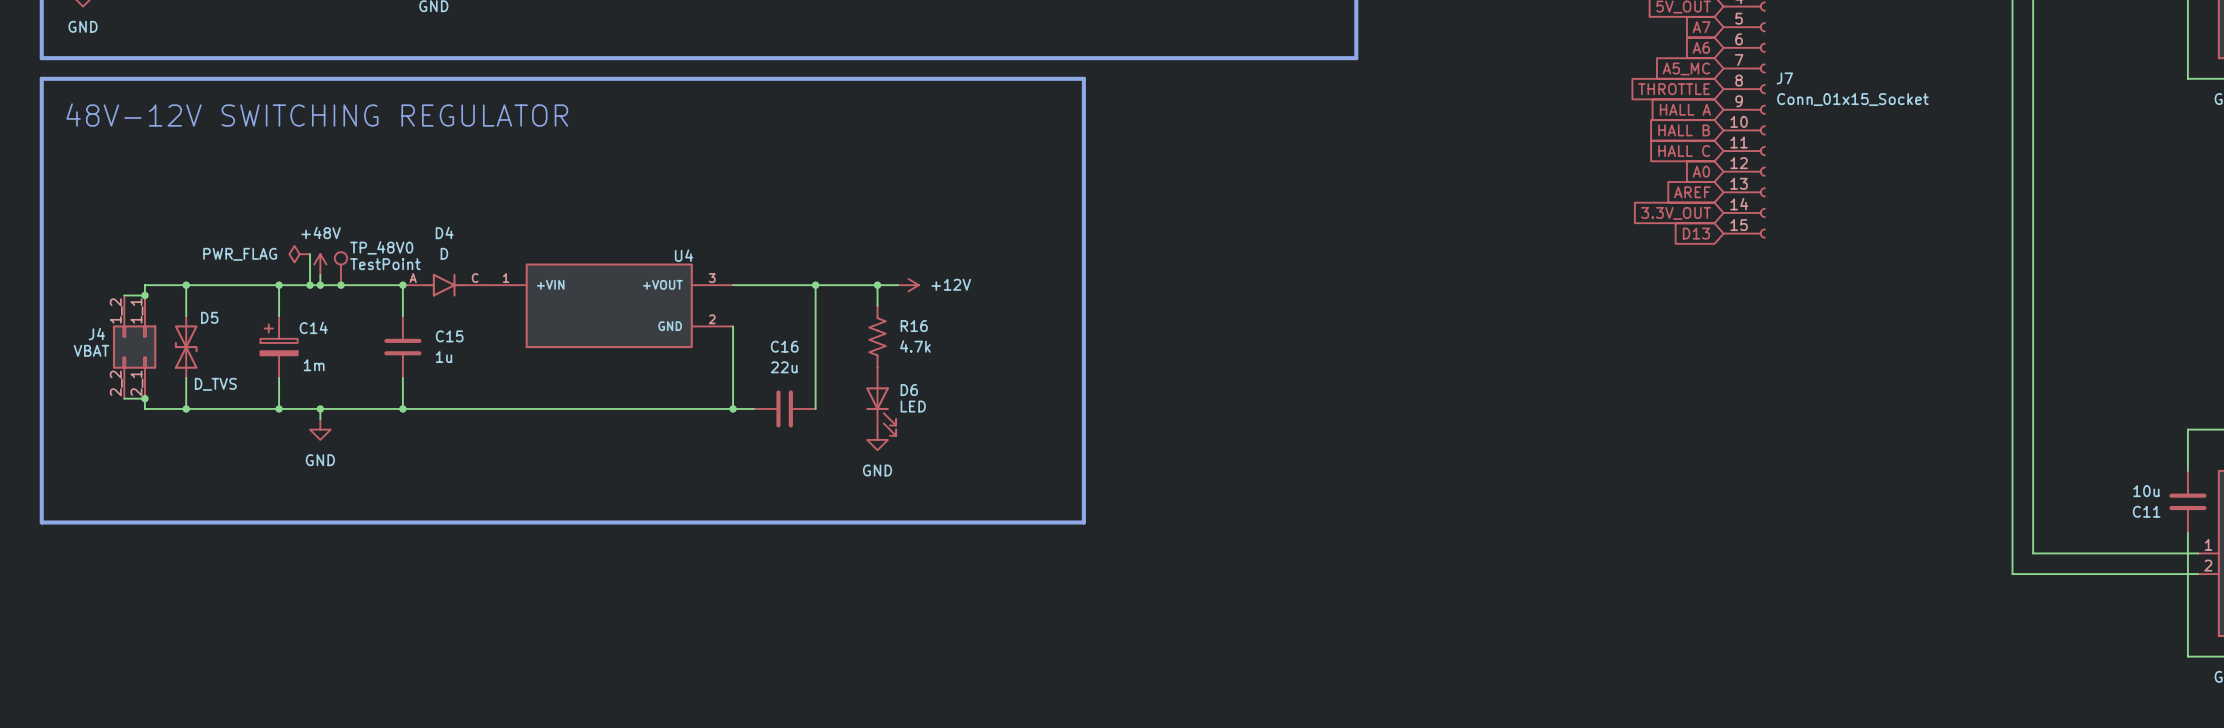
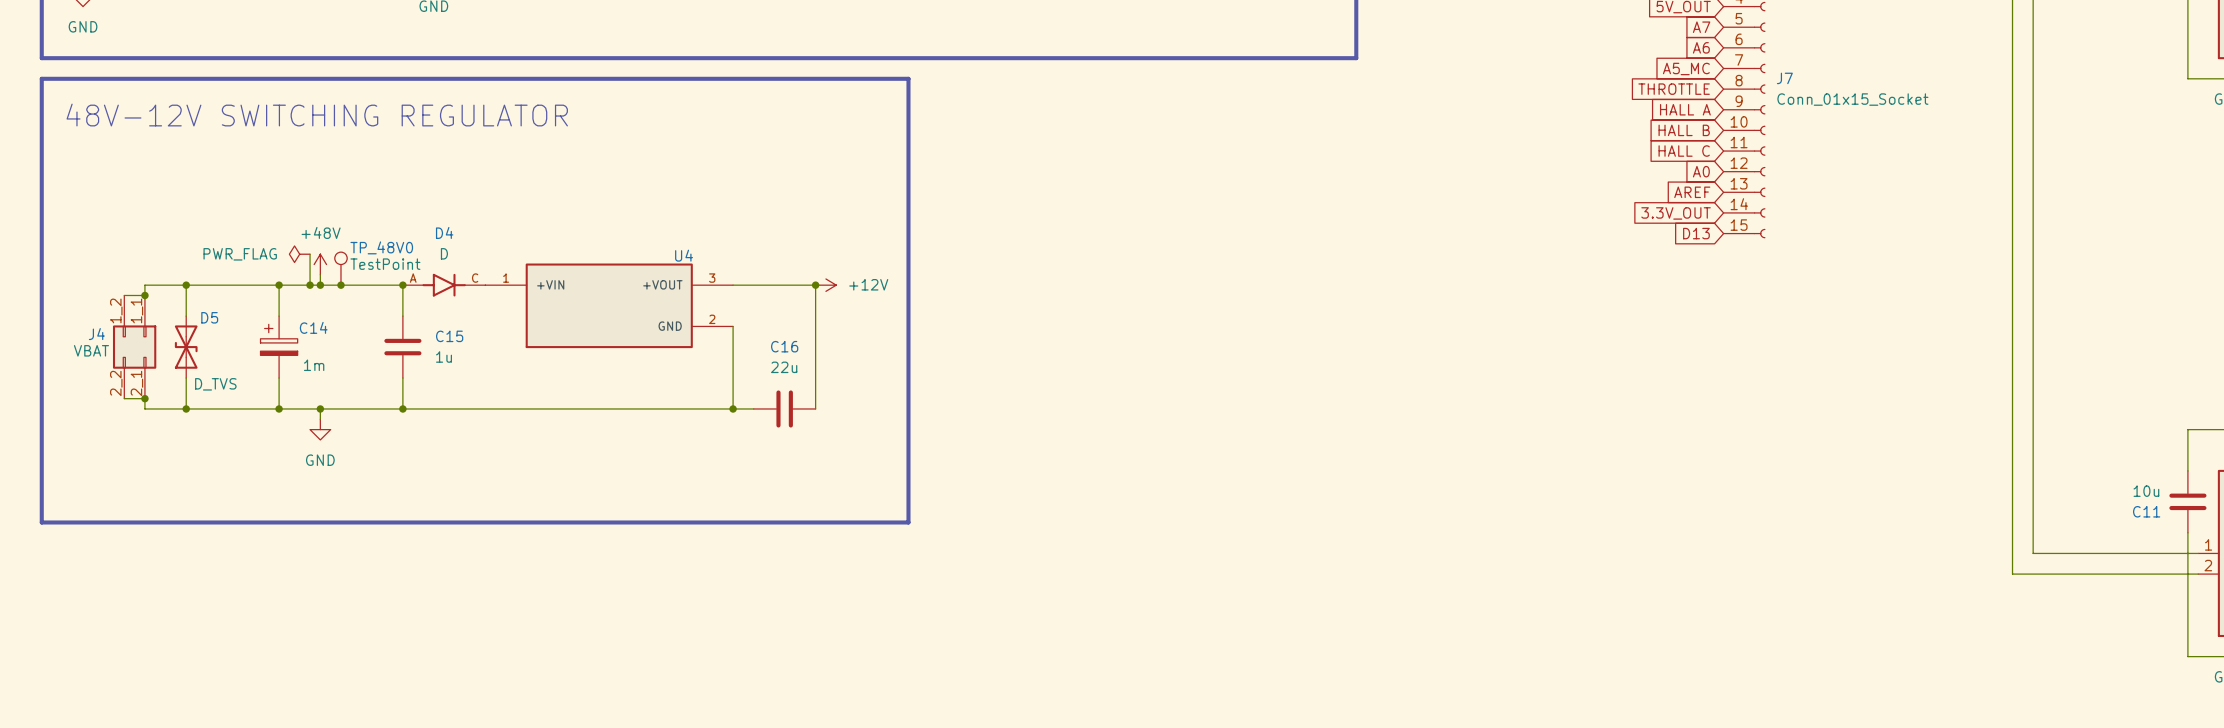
line: (908, 78) (1083, 78) (1083, 522) (908, 522) -> (908, 78) (908, 522)
wire: (815, 285) (898, 285) -> none
wire: (877, 285) (877, 305) -> none
junction: (877, 285) -> none
power symbol position: +12V (908, 285) -> +12V (825, 285)
R16: 4.7k (877, 336) -> none
D6: LED (881, 401) -> none
power symbol: GND (877, 439) -> none

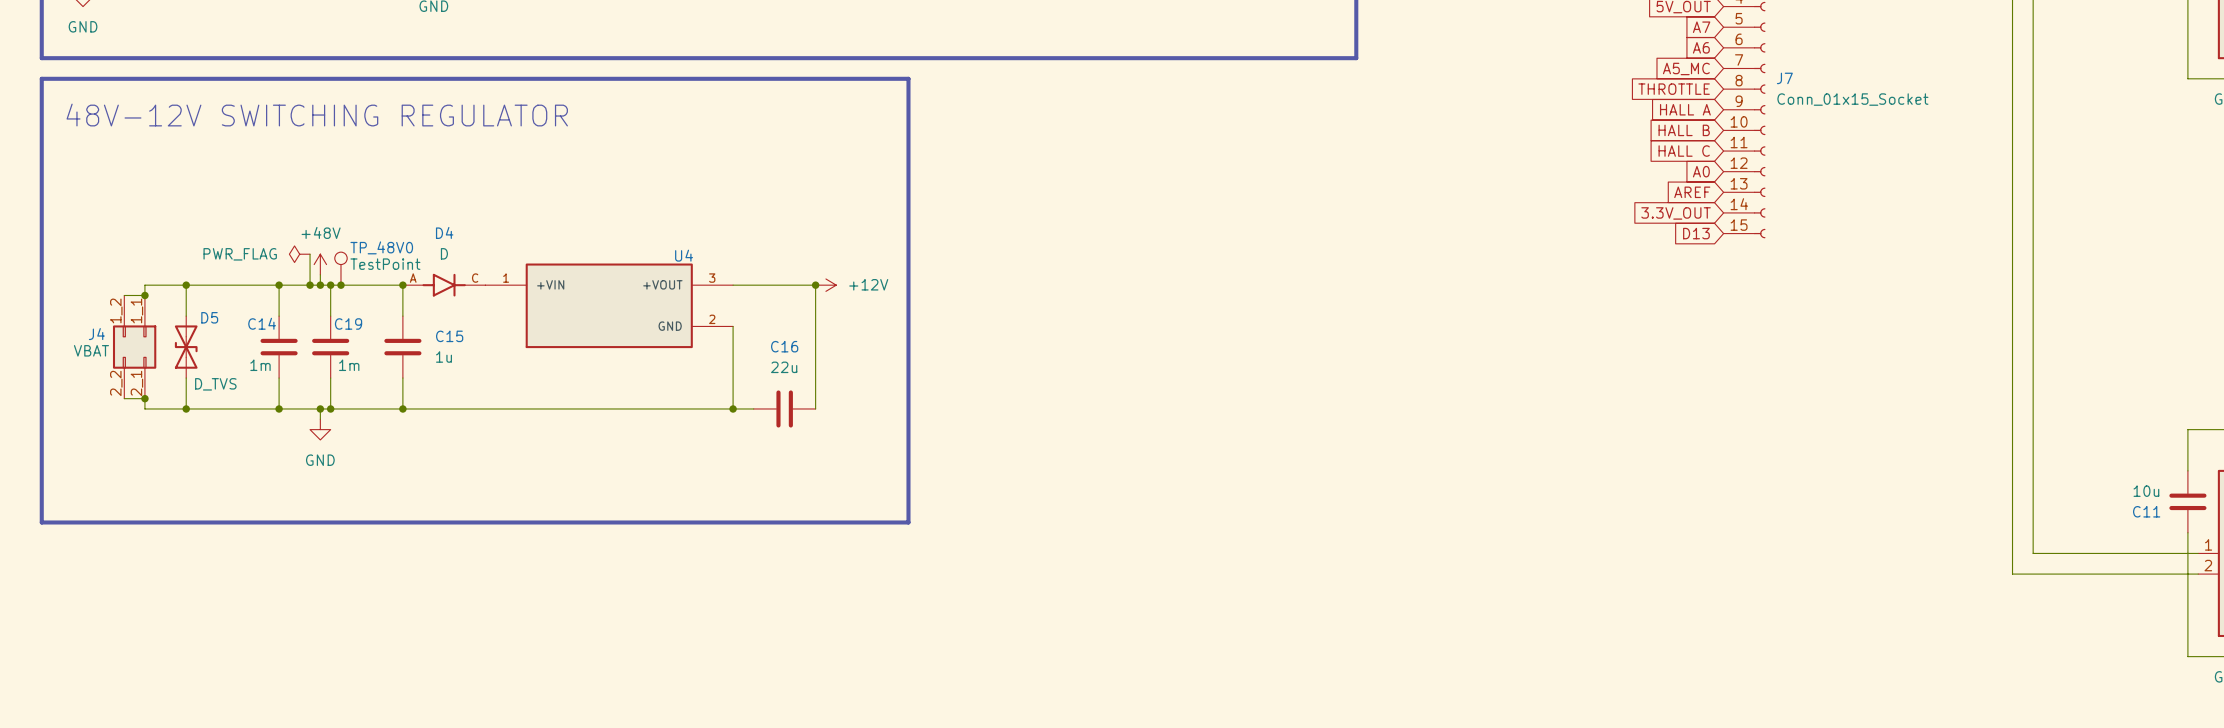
wire: none -> (330, 285) (330, 316)
junction: none -> (330, 285)
C14 symbol: [260, 316, 298, 379] -> [260, 316, 298, 379]
C14 name position: C14 (313, 327) -> C14 (262, 323)
C19: none -> 1m (330, 347)
C14 value position: 1m (314, 365) -> 1m (260, 365)
wire: none -> (330, 378) (330, 408)
junction: none -> (330, 408)

